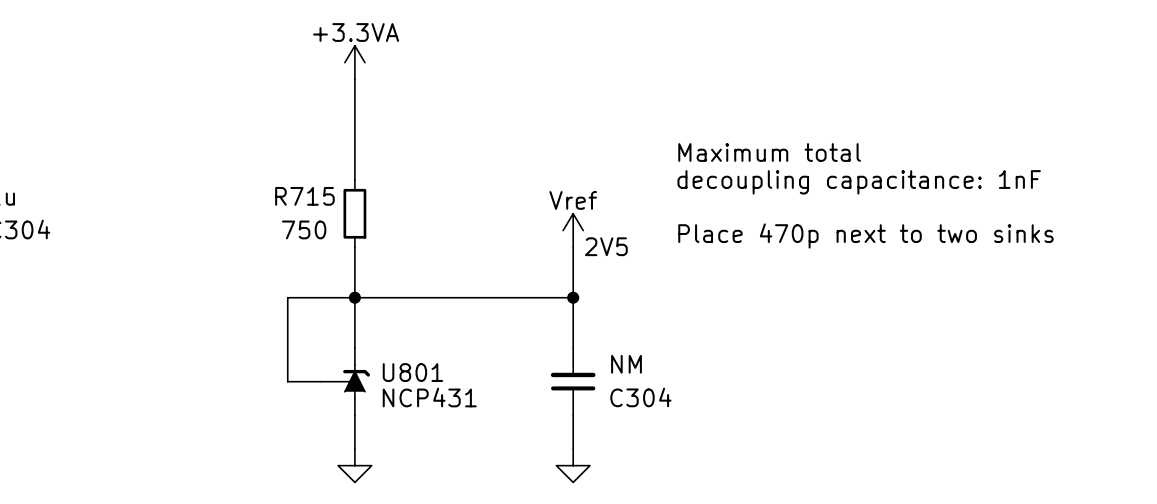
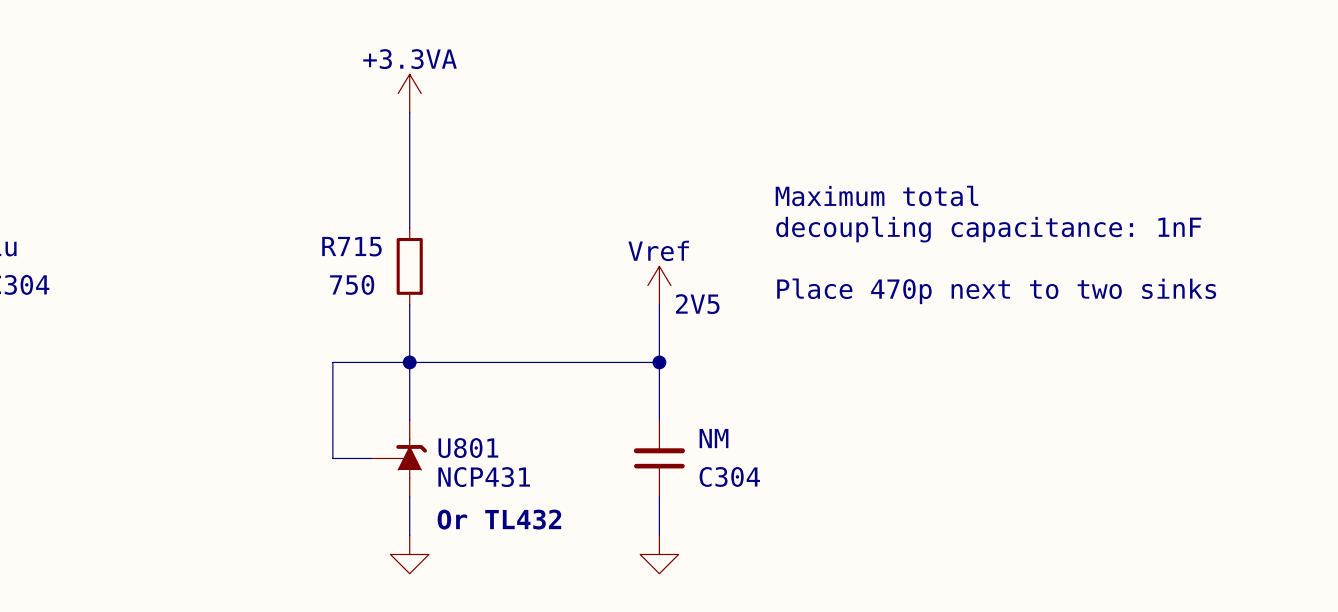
text: none -> Or TL432 (499, 519)

